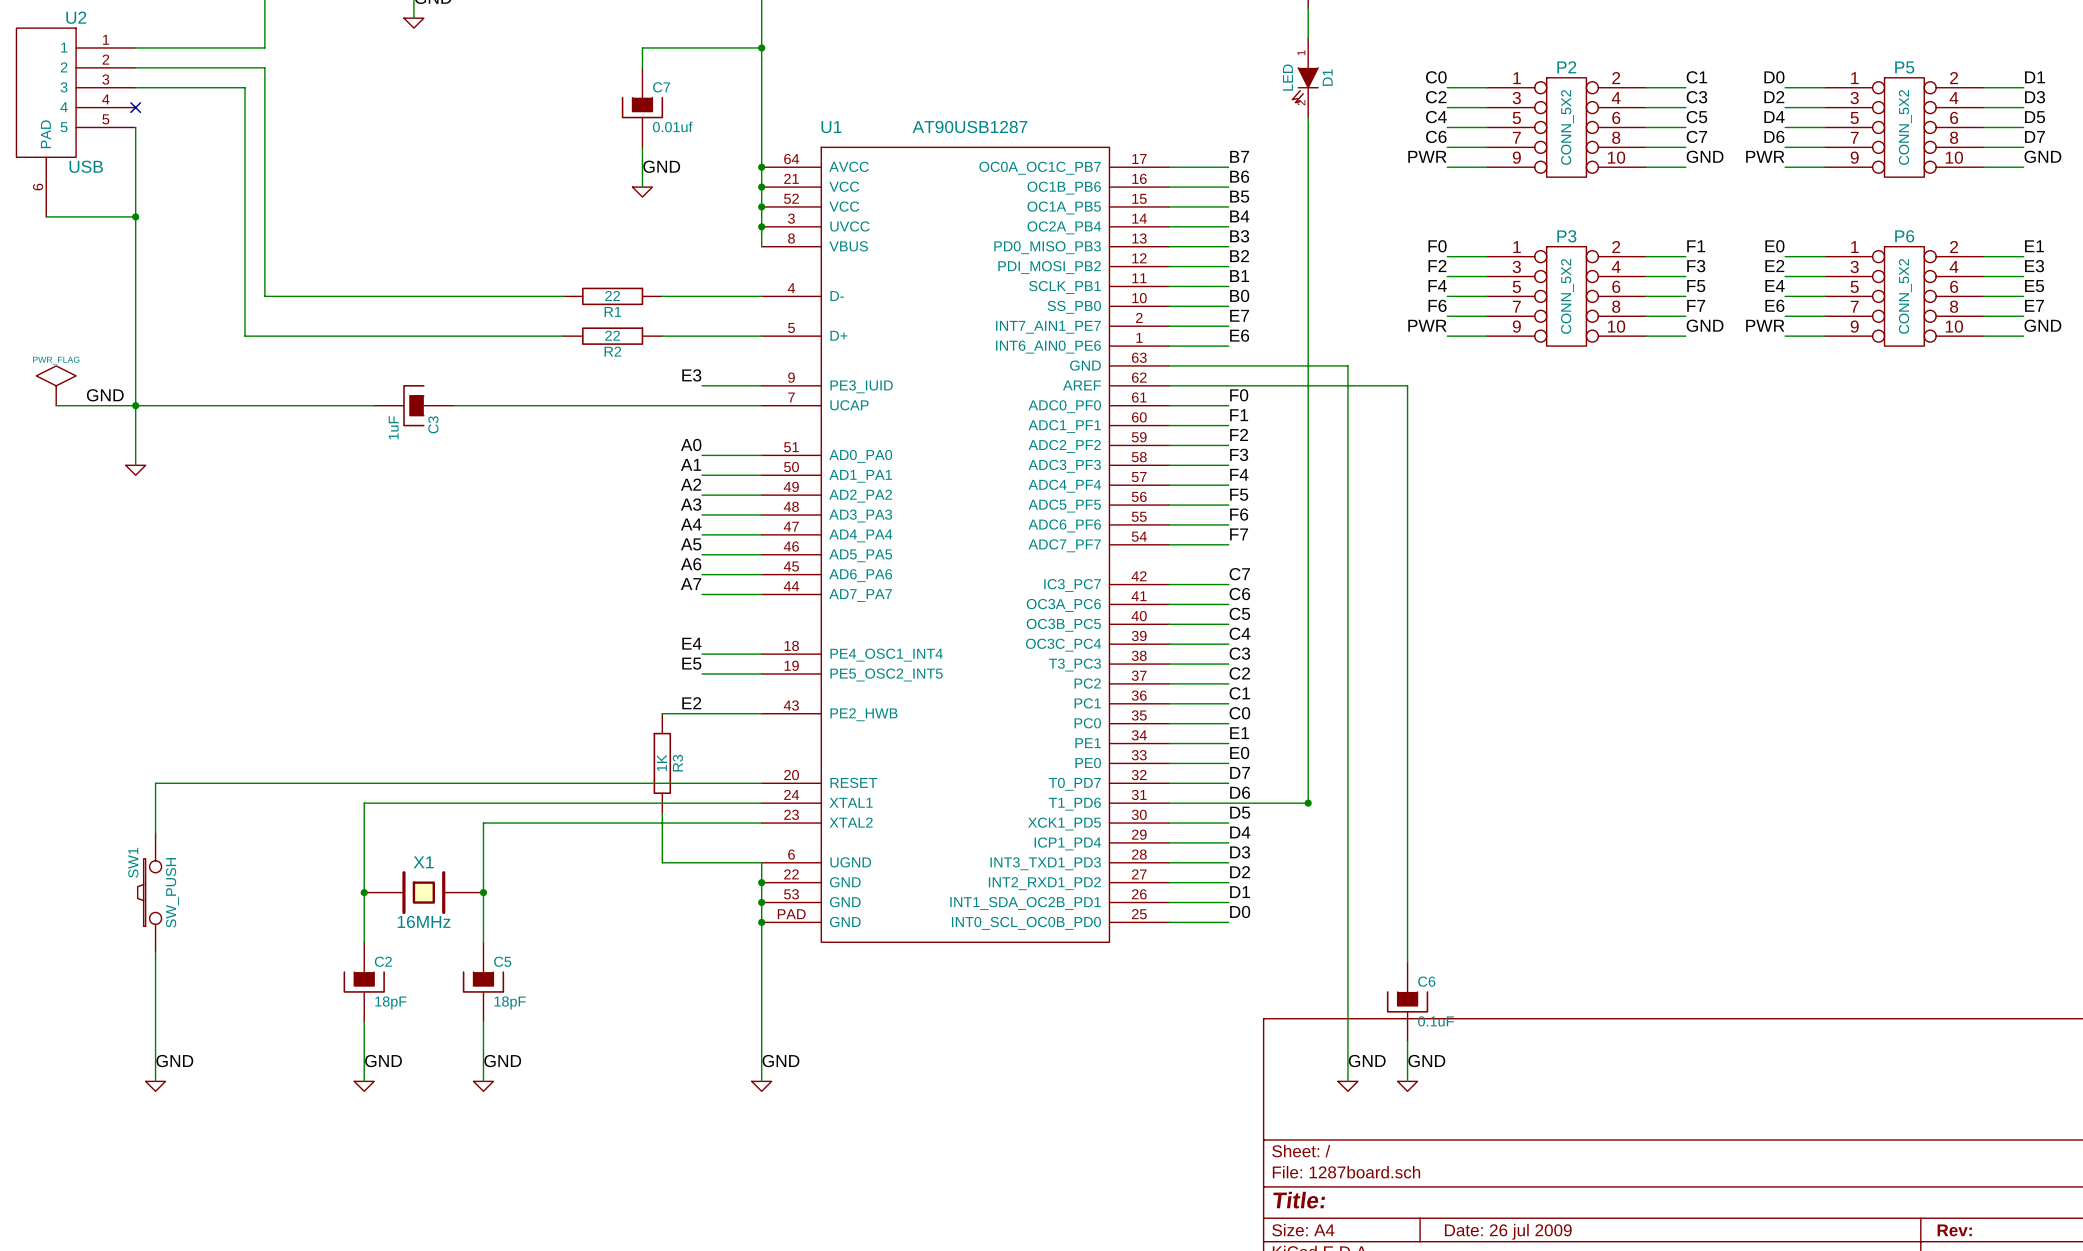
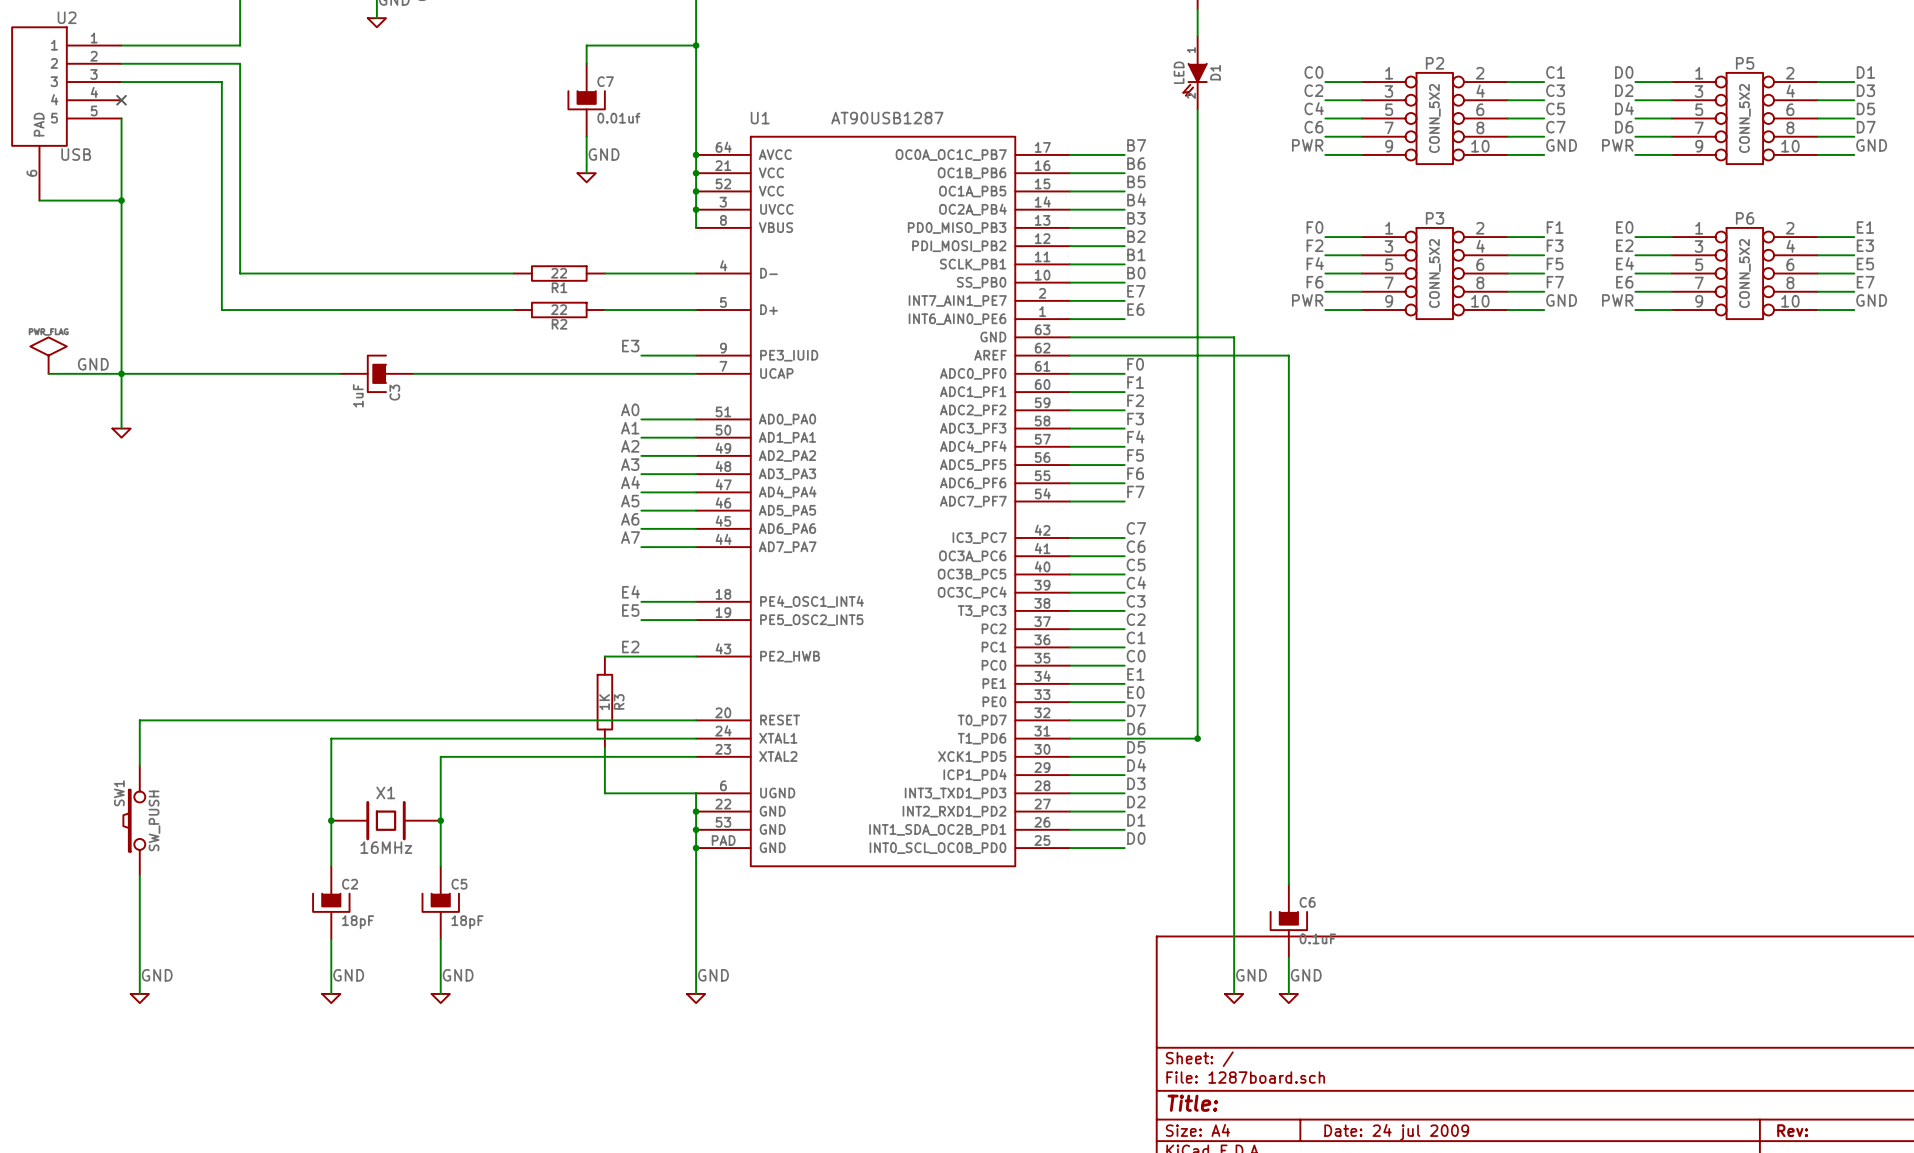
title block: Date: 26 jul 2009 (1508, 1231) -> Date: 24 jul 2009 (1396, 1132)

